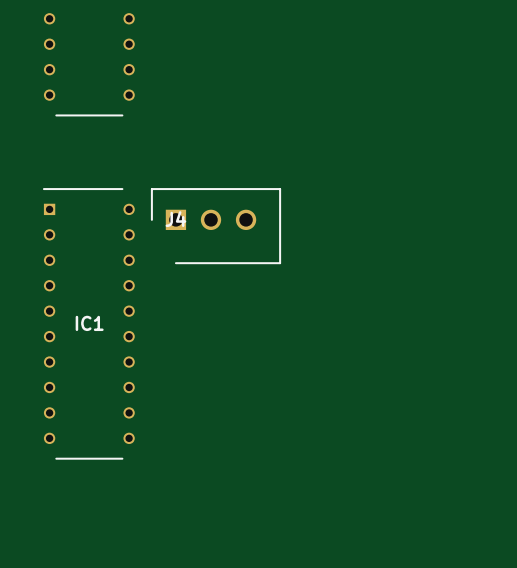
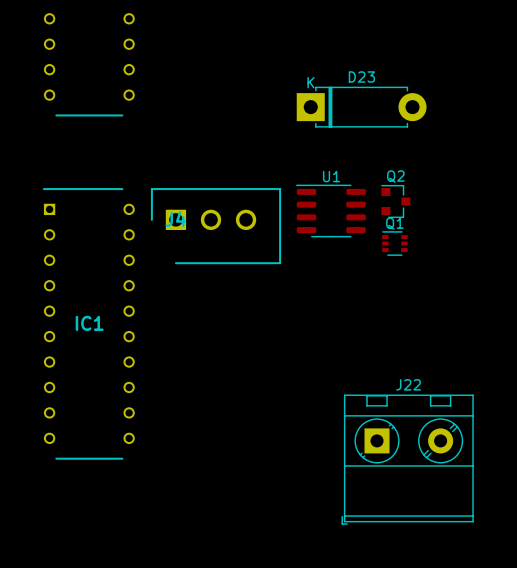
D23: none -> (361, 107)
Q2: none -> (395, 201)
U1: none -> (330, 210)
Q1: none -> (394, 243)
J22: none -> (407, 459)

